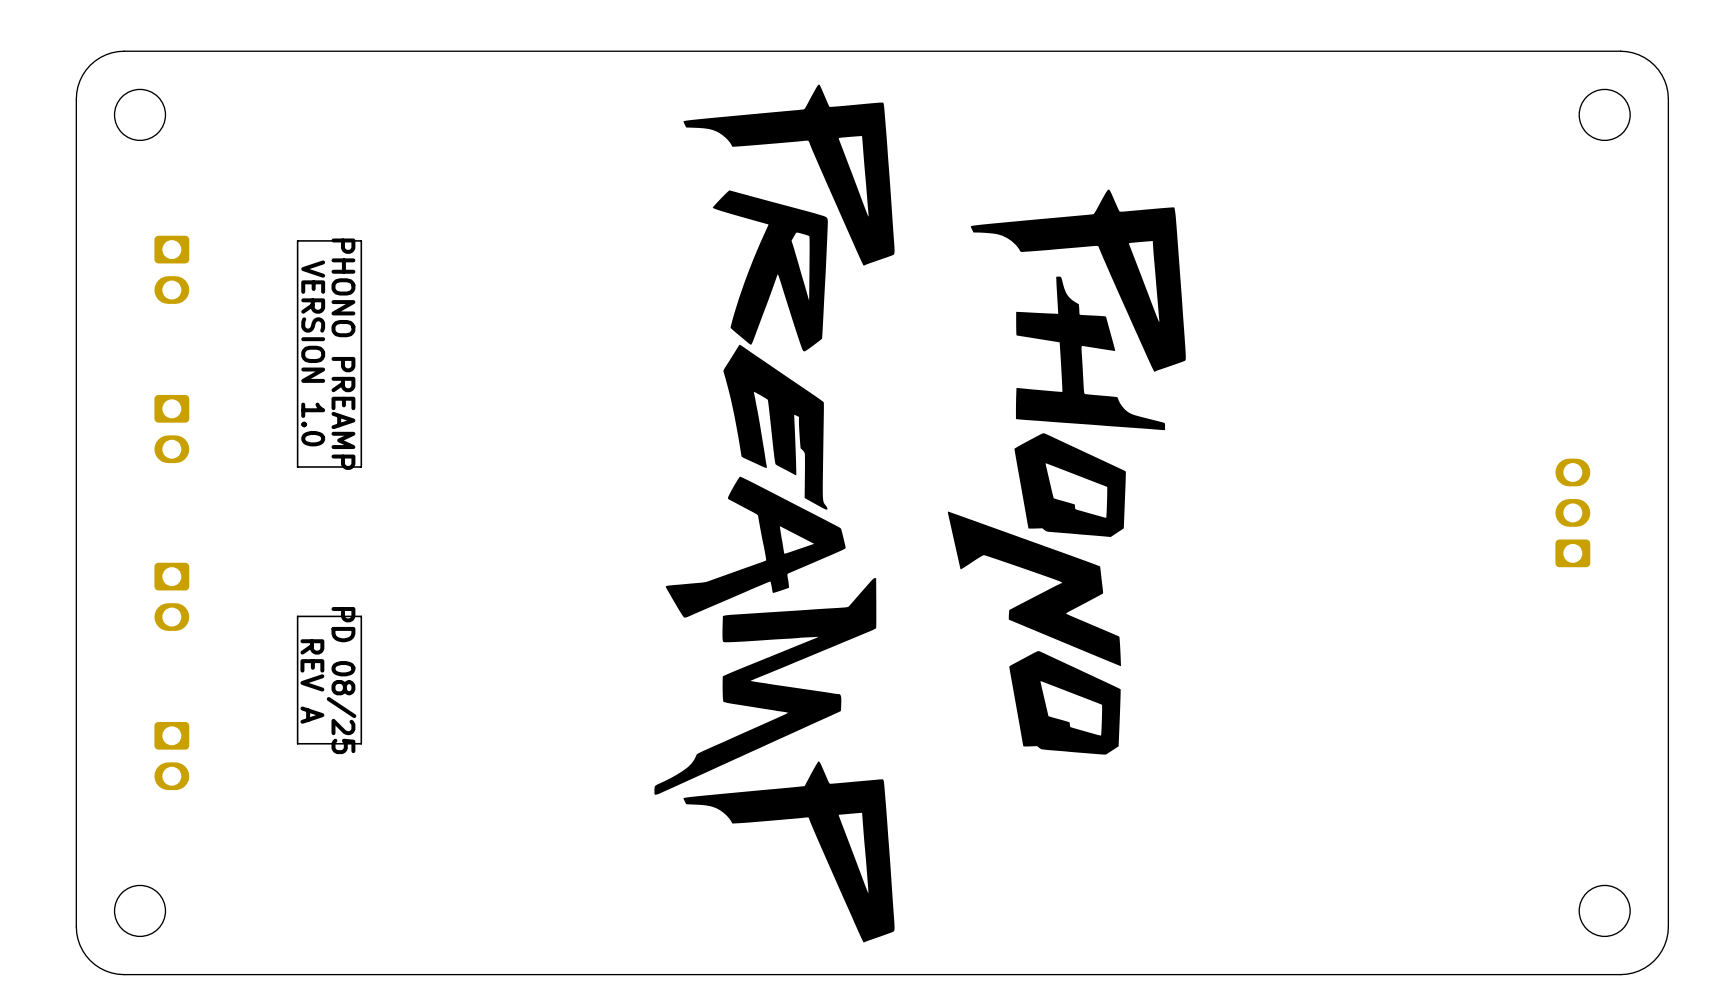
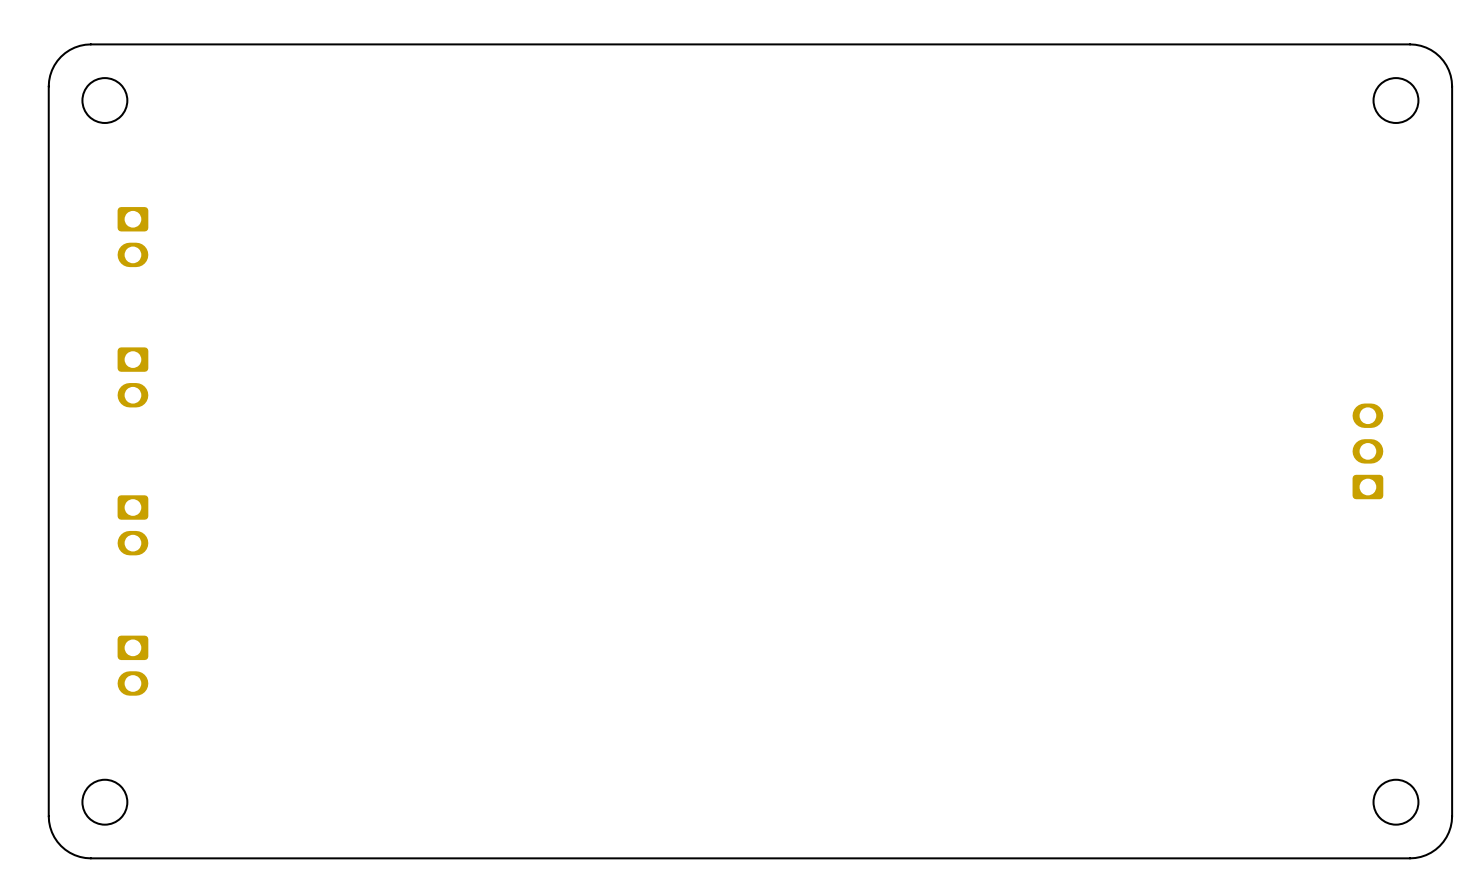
drawing: [654, 84, 1186, 943] -> none
line: (361, 240) (361, 466) (297, 466) (297, 240) (361, 240) -> none
text: VERSION 1.0 (313, 353) -> none
text: PHONO PREAMP (343, 354) -> none
line: (361, 616) (297, 616) (297, 743) (361, 743) (361, 616) -> none
text: PD 08/25 (341, 680) -> none
text: REV A (312, 681) -> none

